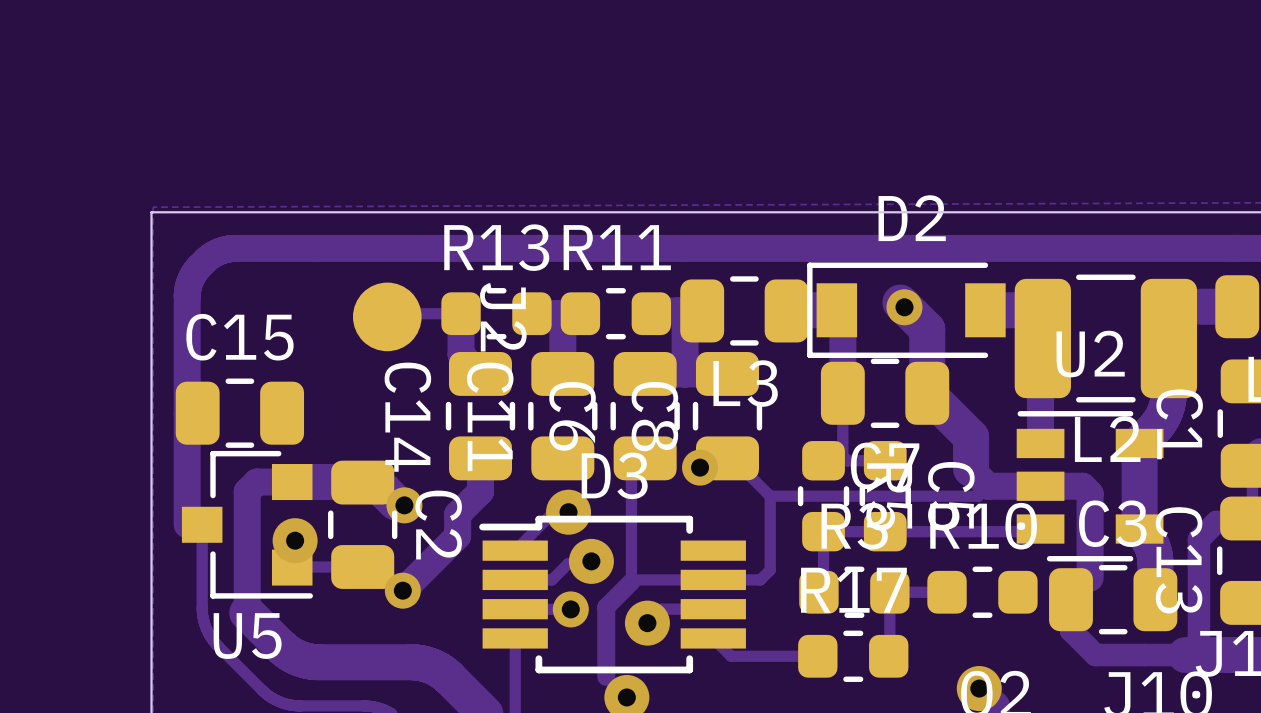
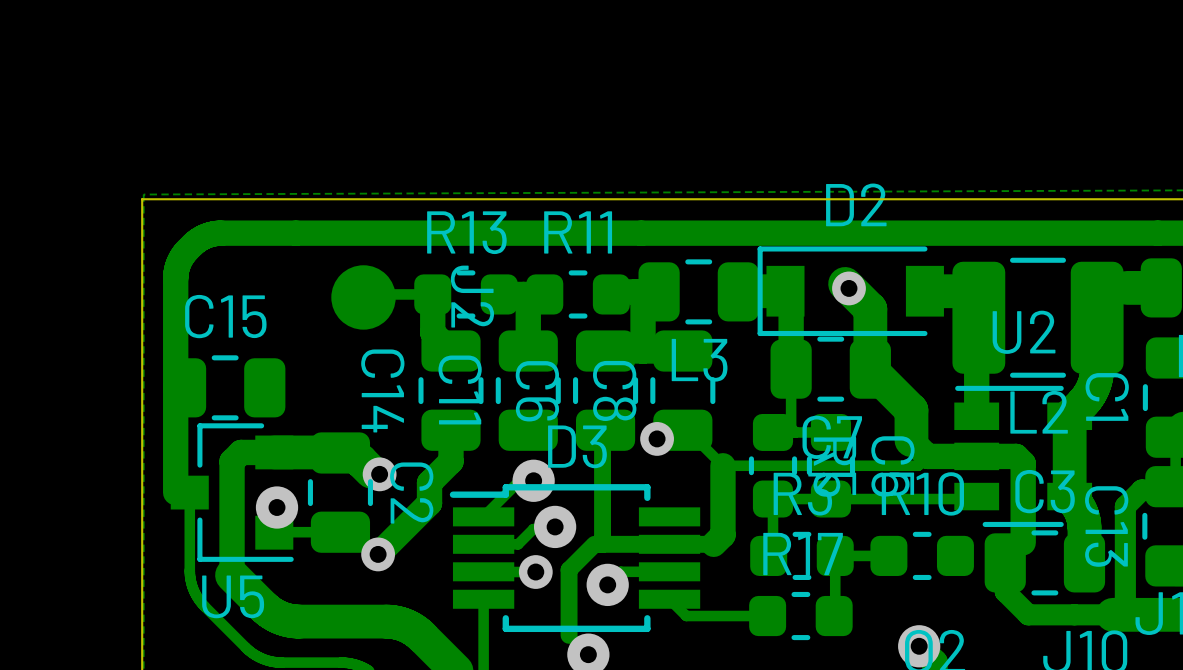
track: none -> (602, 433) (602, 544)
track: (631, 472) (631, 581) -> none
track width: thin (770, 496) (770, 570) (760, 579) (633, 579) -> thick (722, 465) (722, 535) (713, 544) (594, 544)

